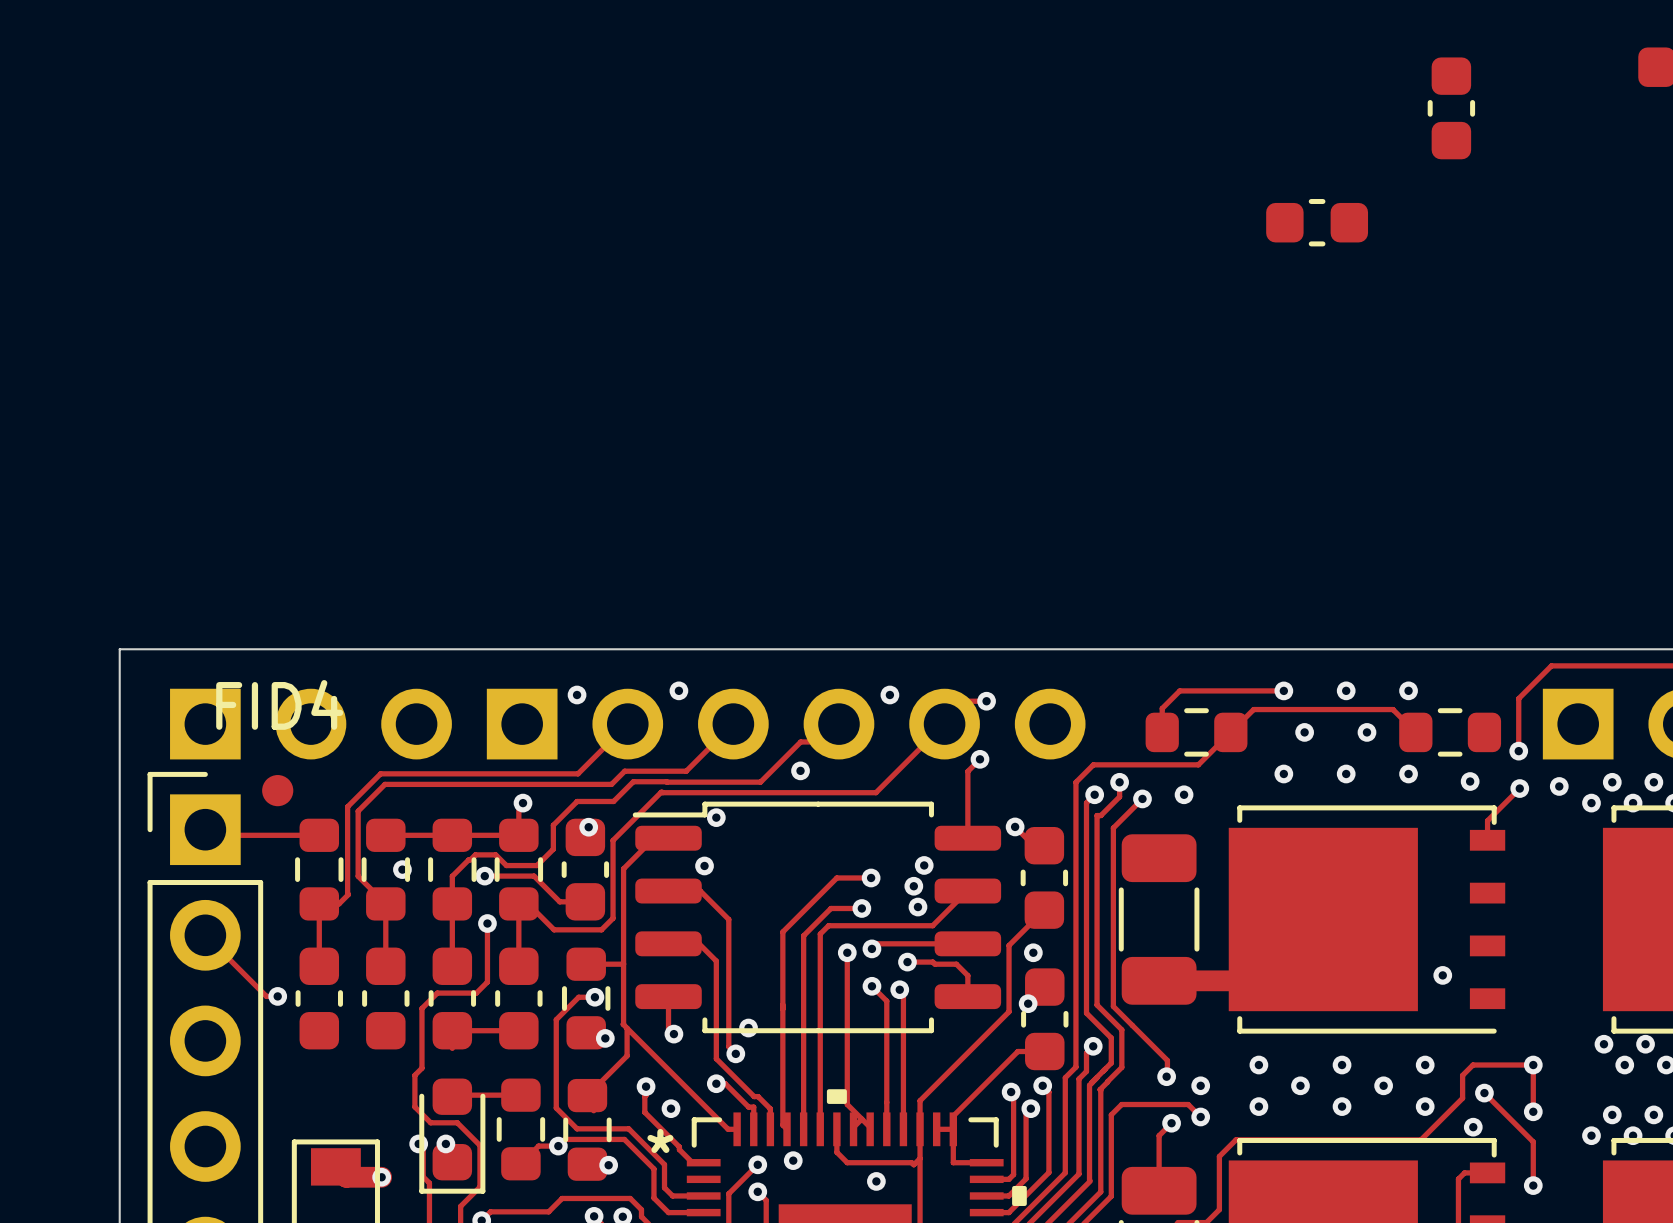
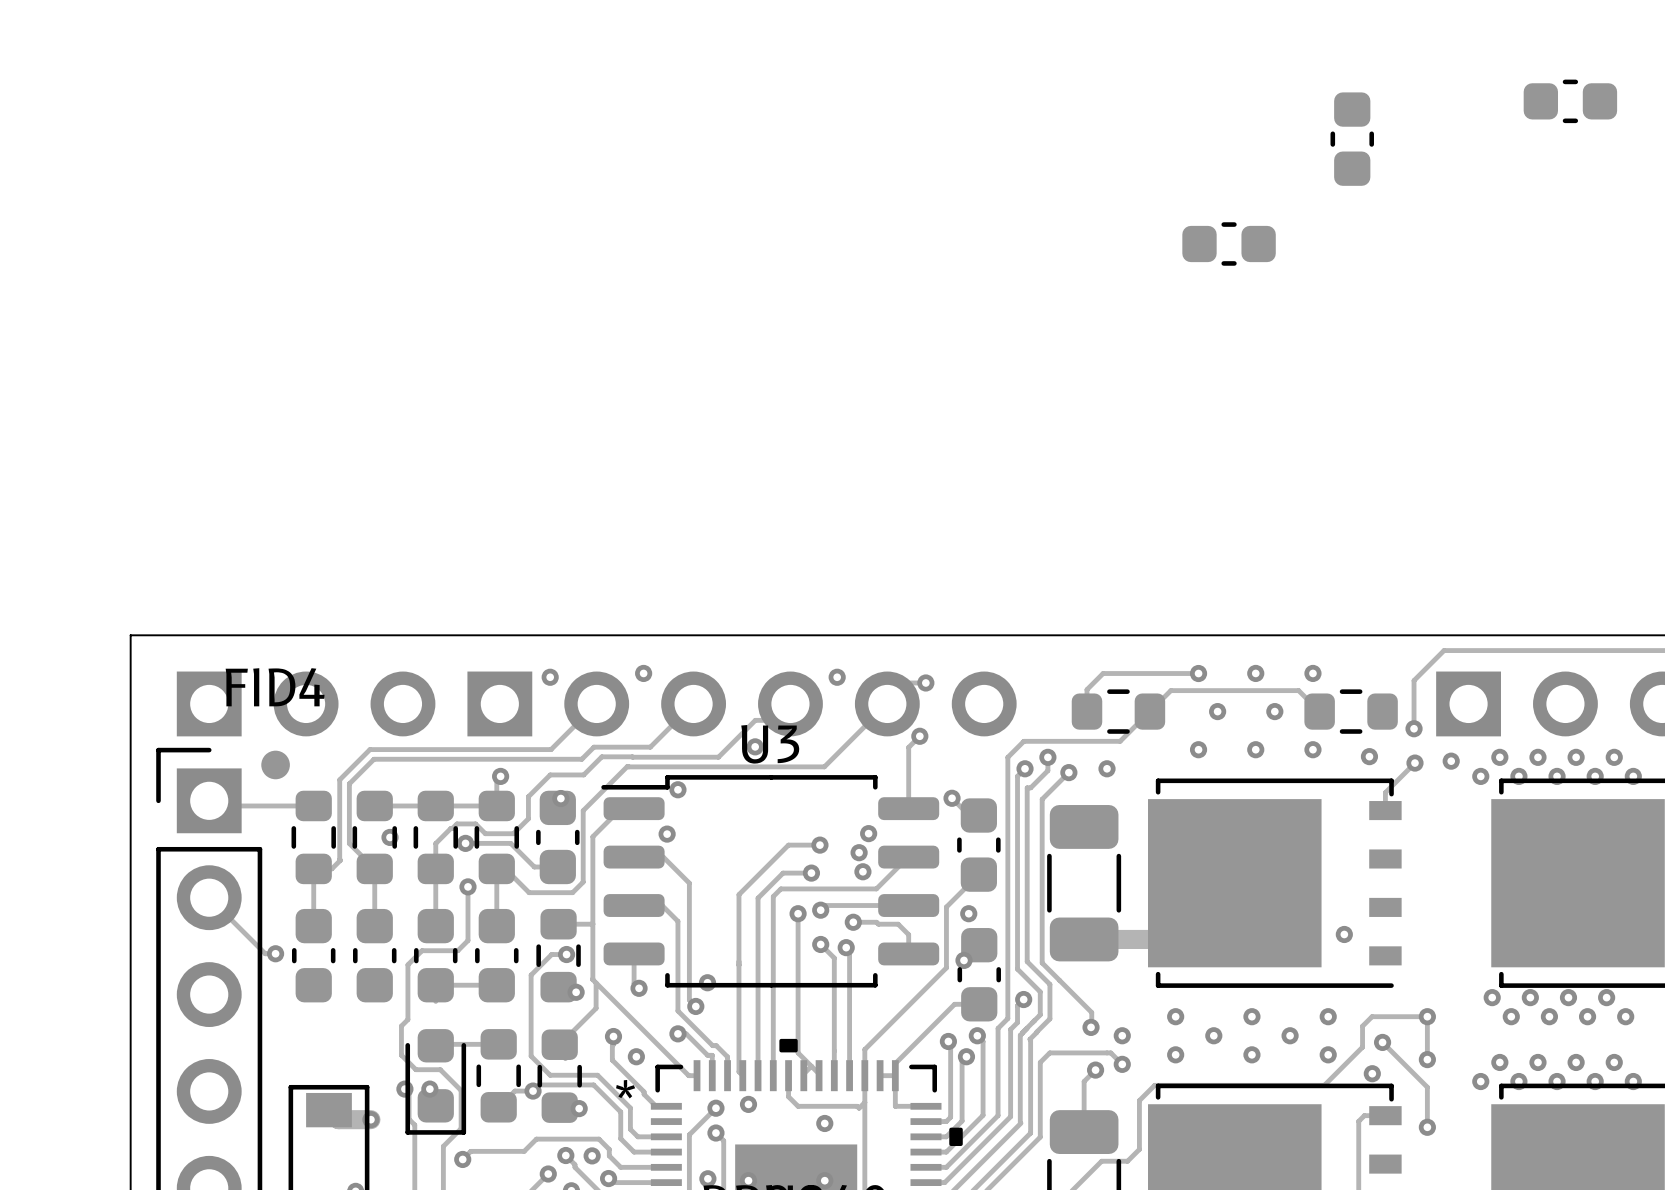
U3 name: none -> U3 (770, 744)

